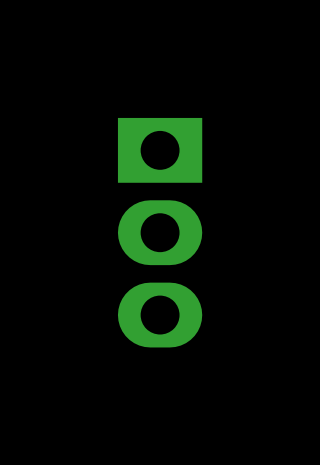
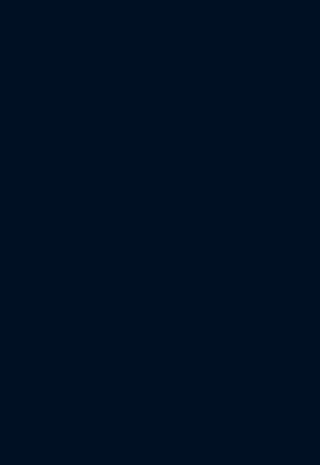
part: (160, 232) -> none

